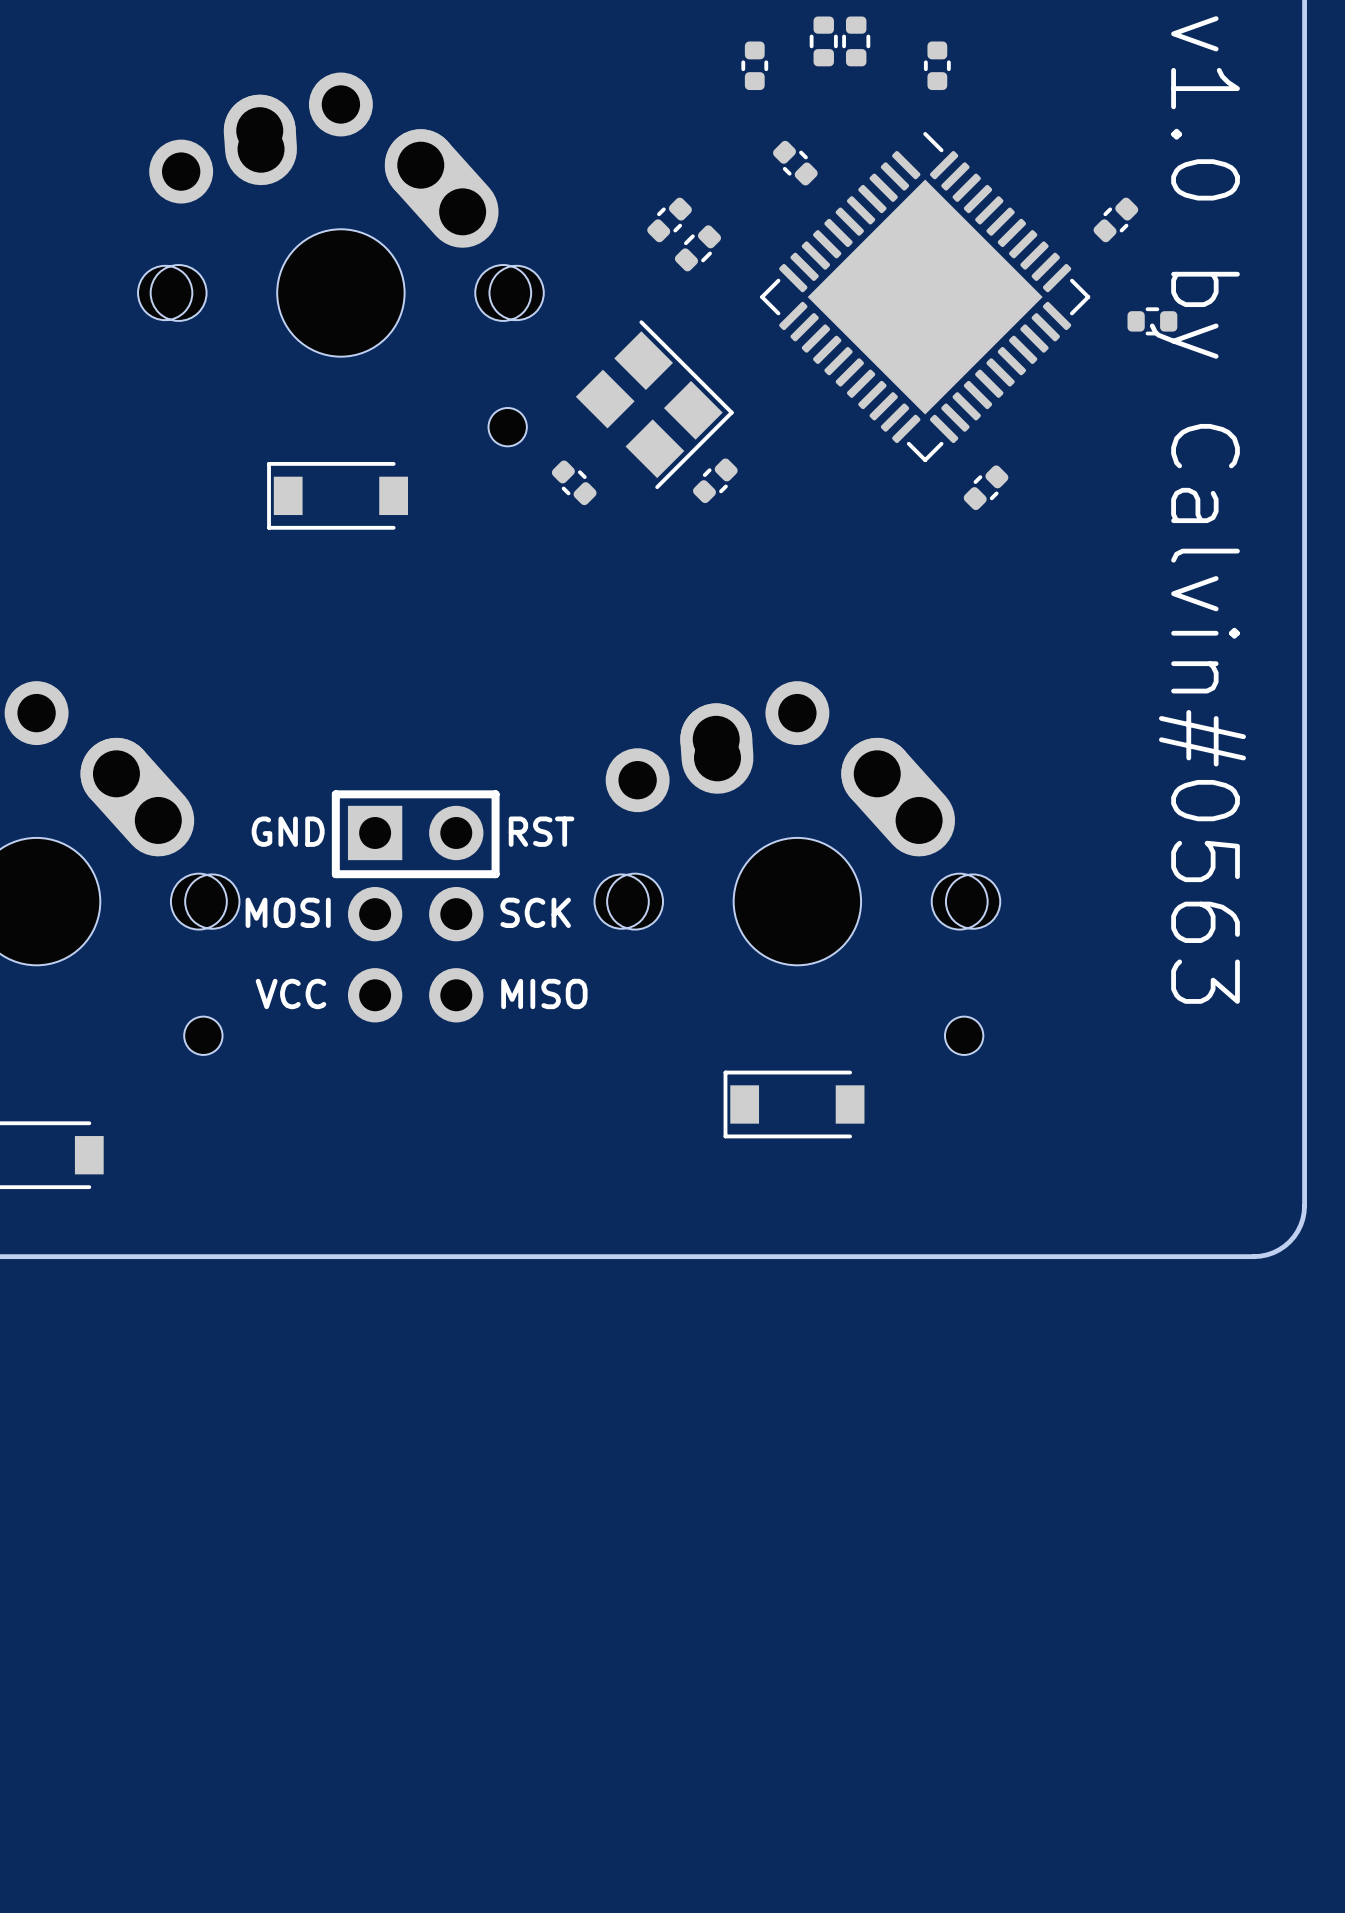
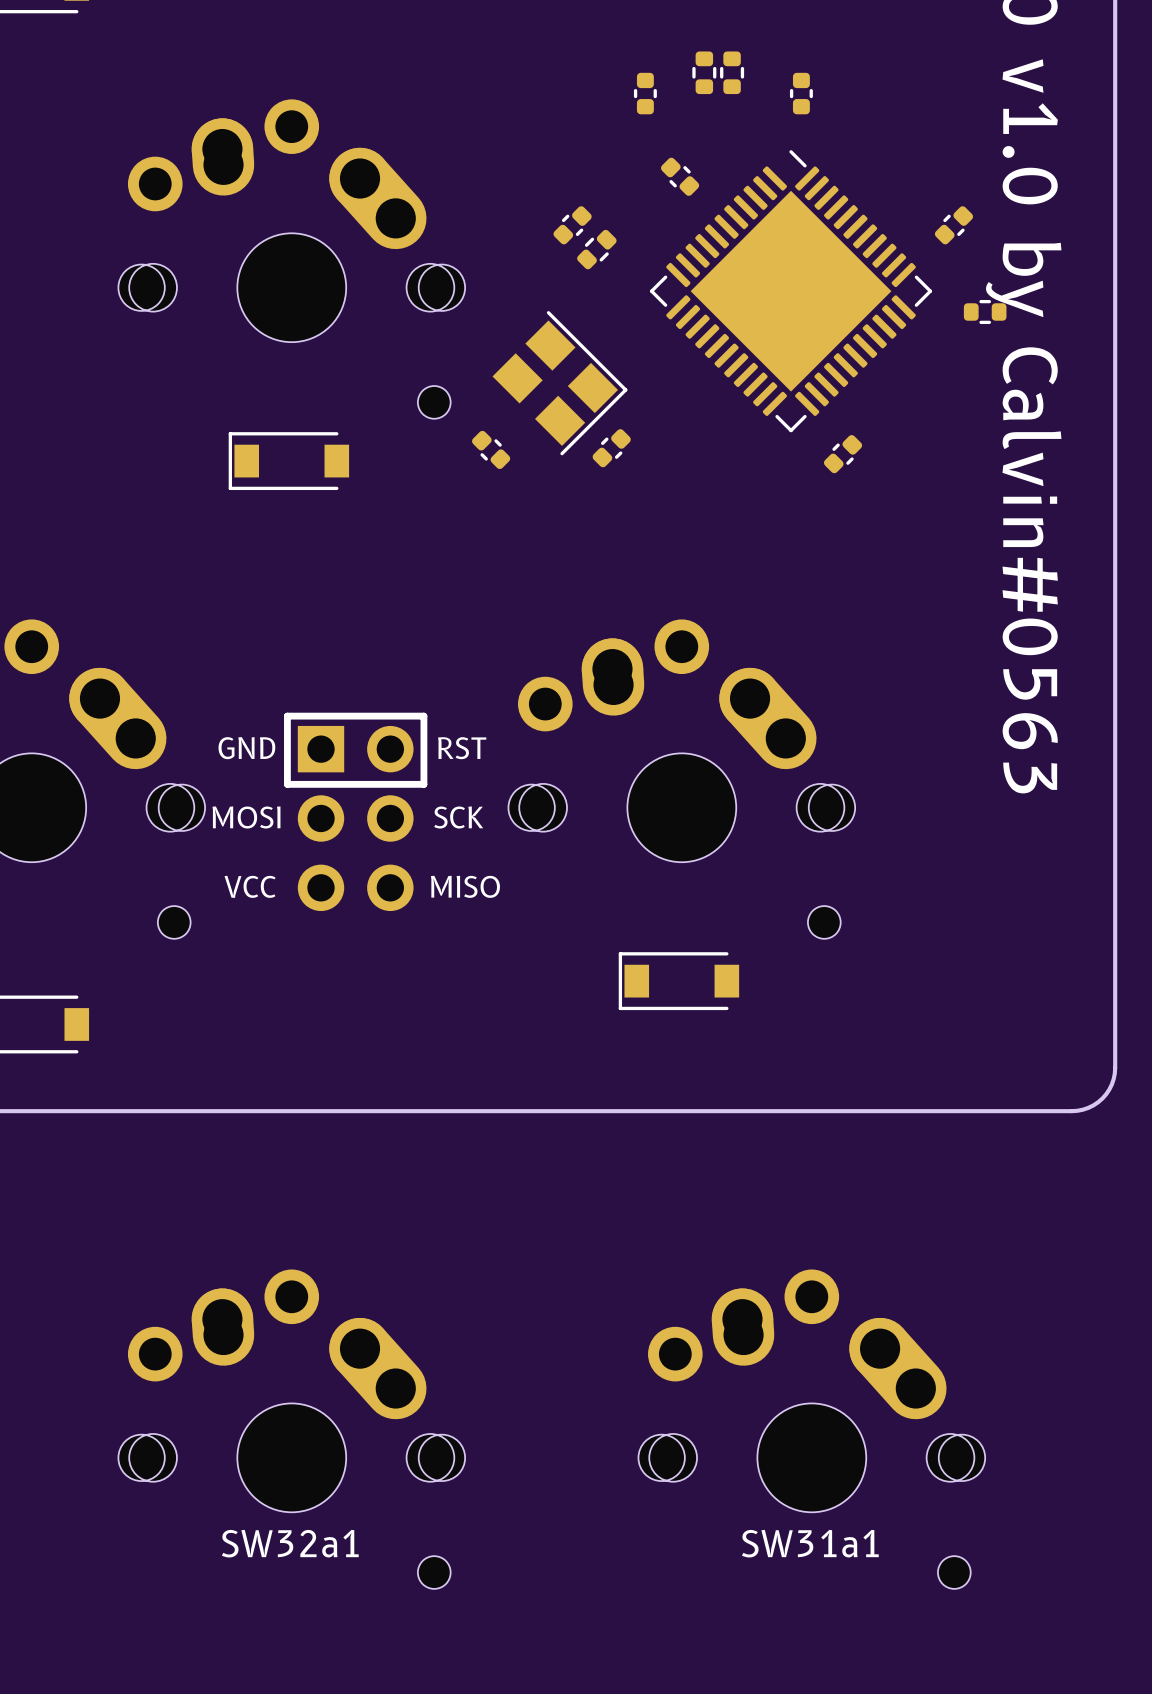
SW32a1: none -> (291, 1429)
SW31a1: none -> (811, 1429)

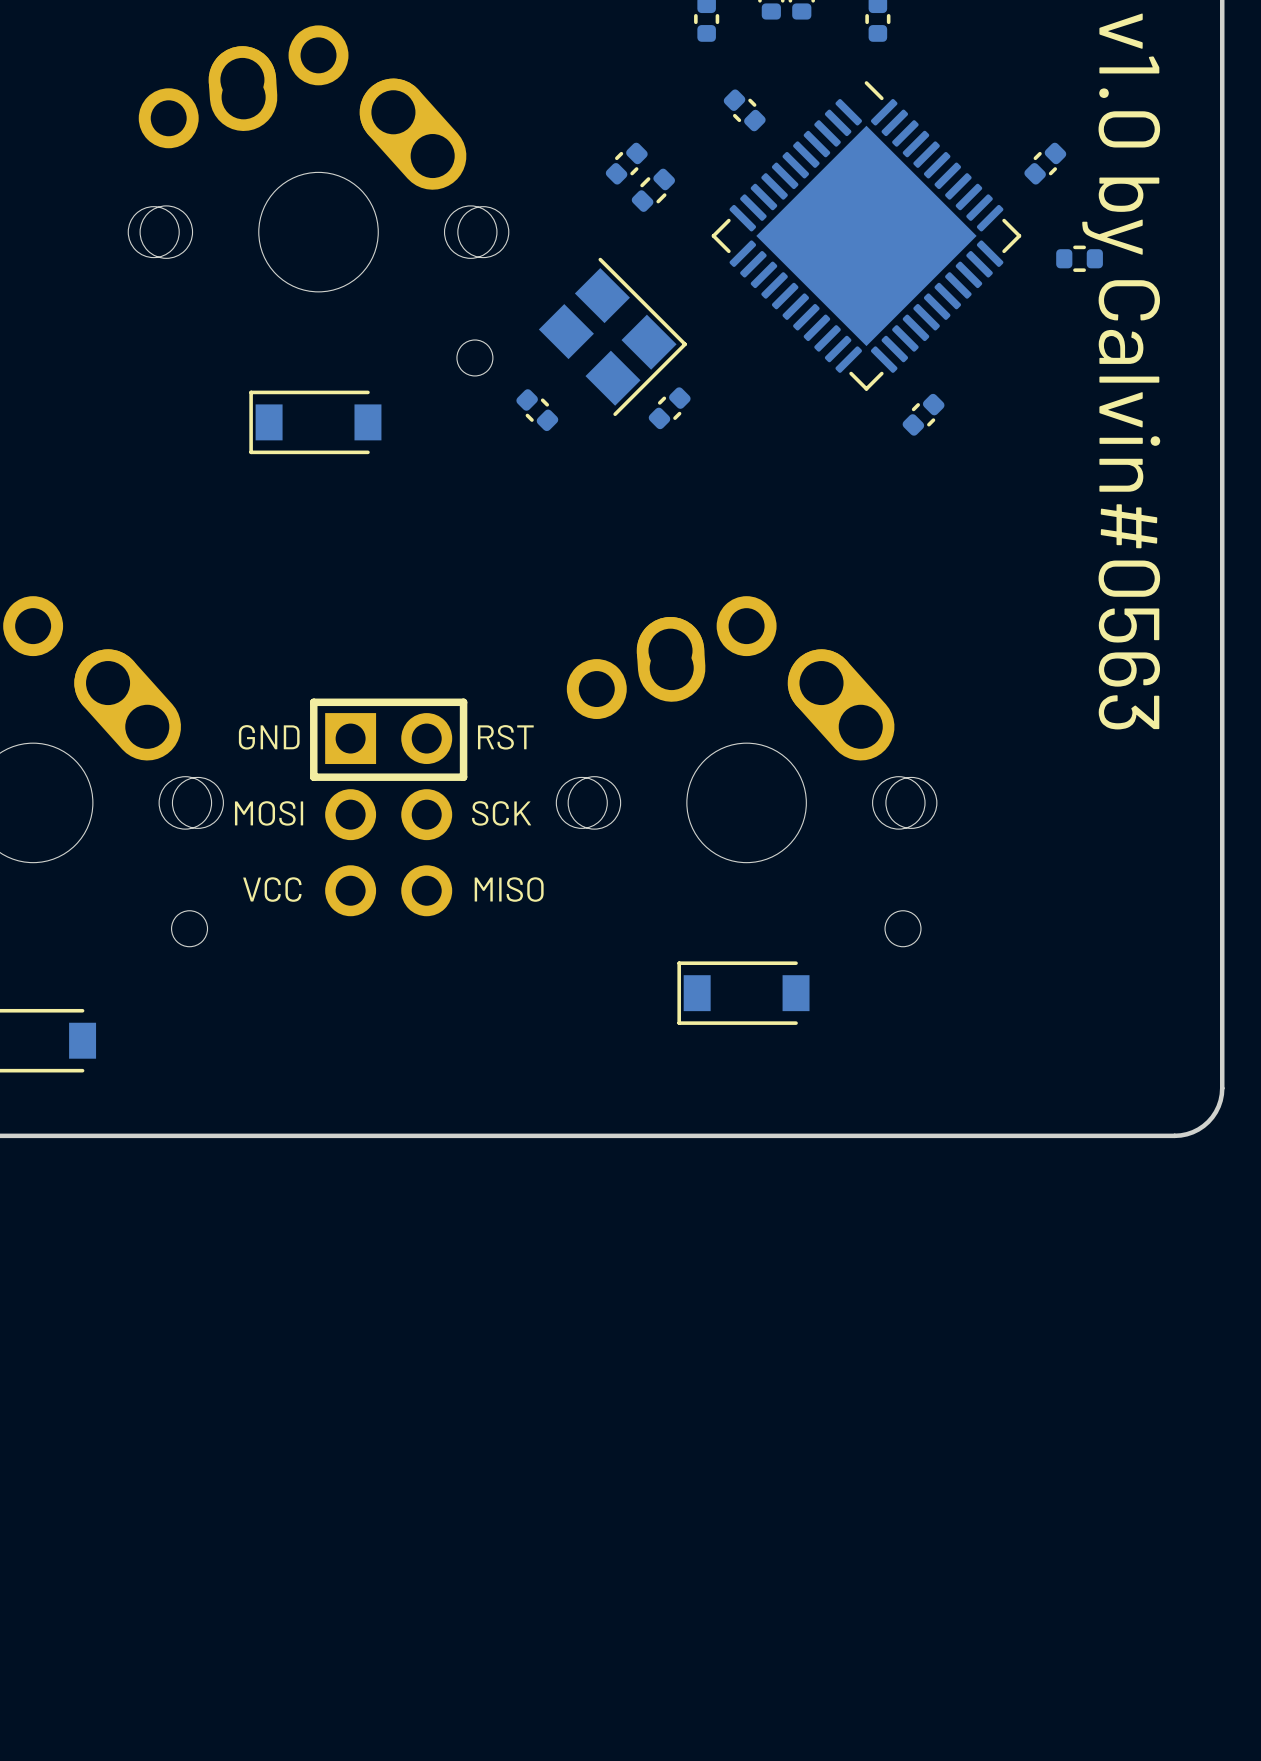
SW32a1: (291, 1429) -> none
SW31a1: (811, 1429) -> none

